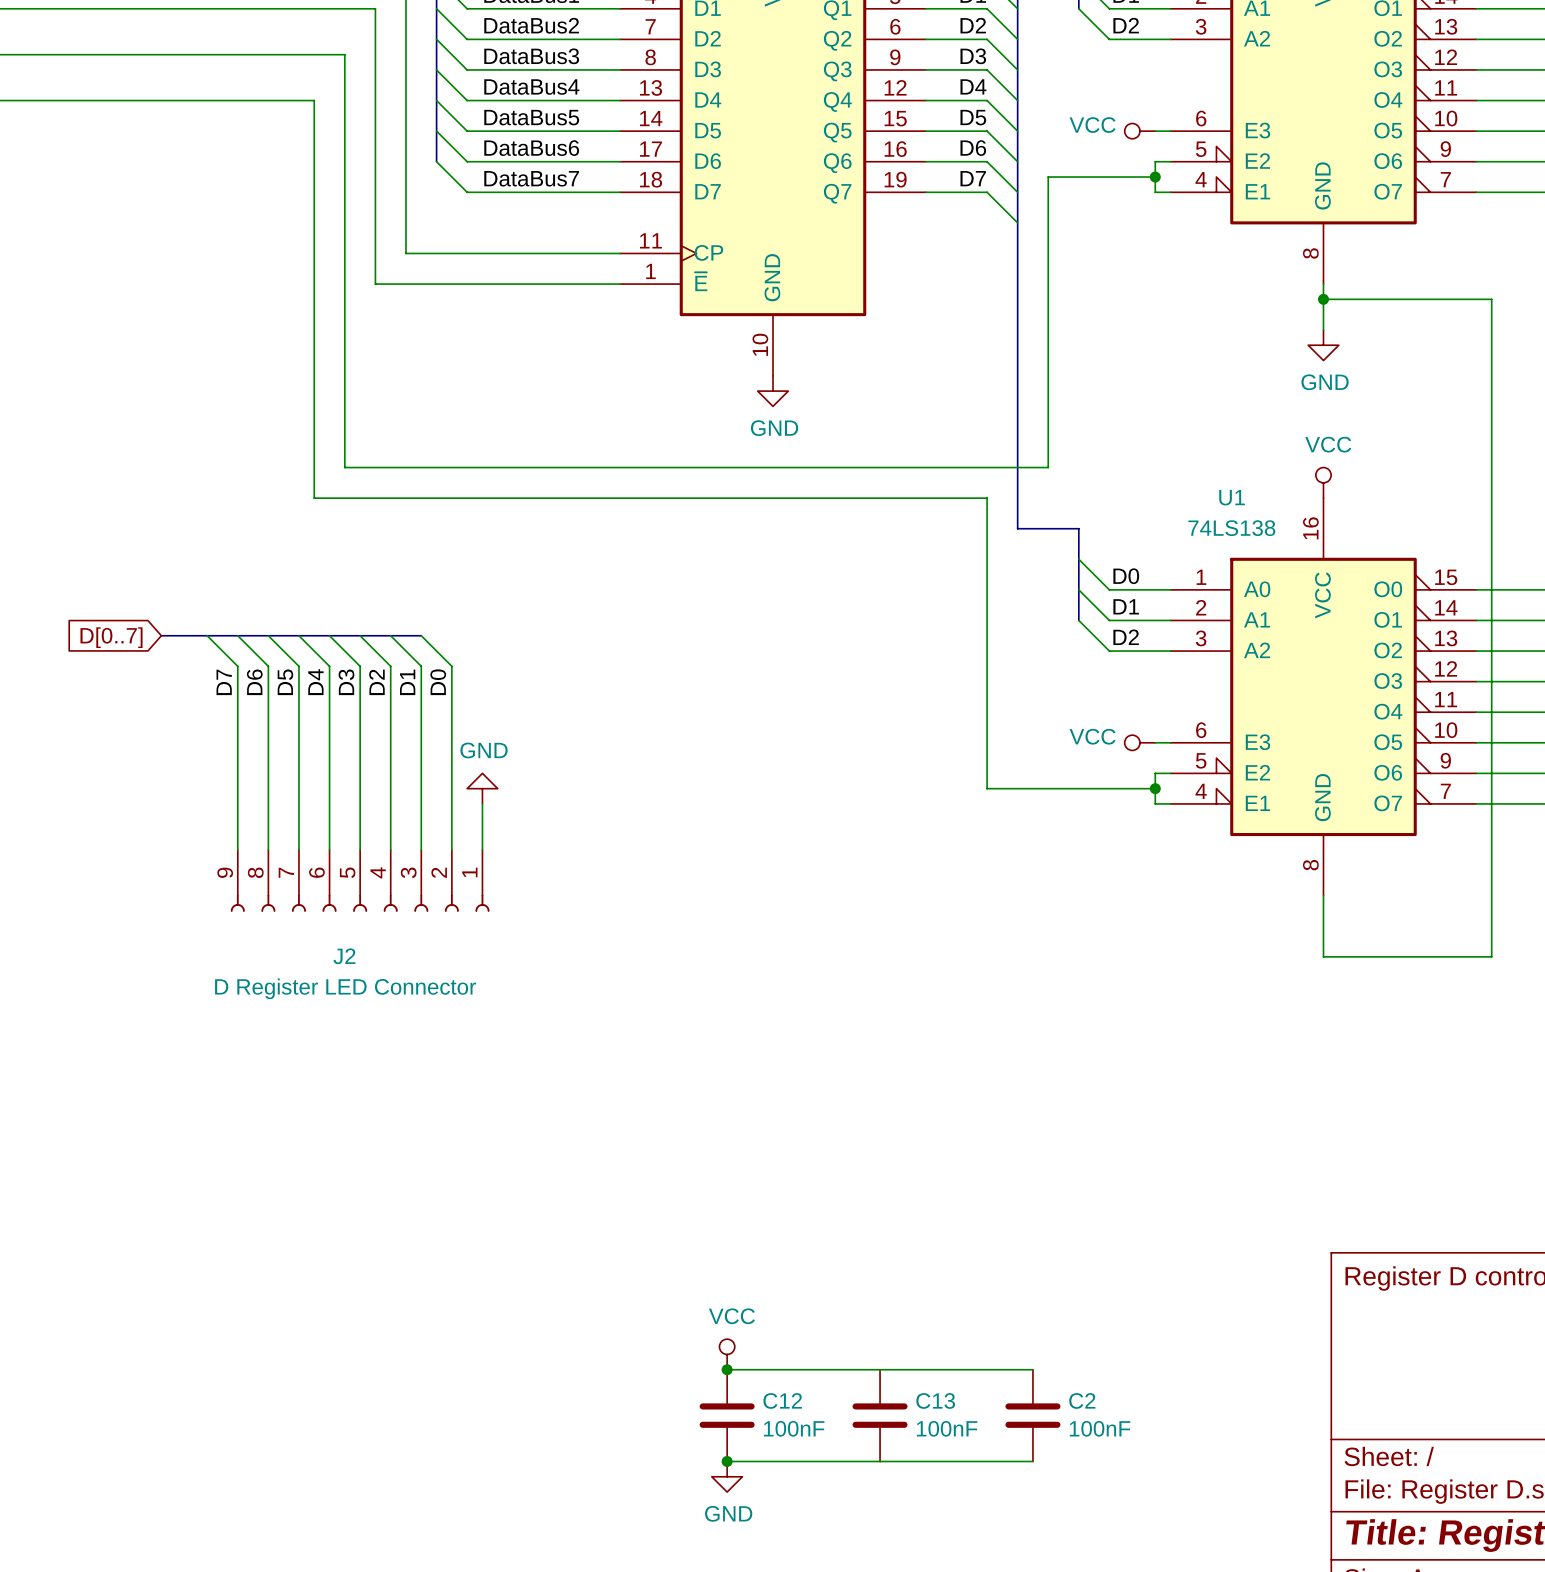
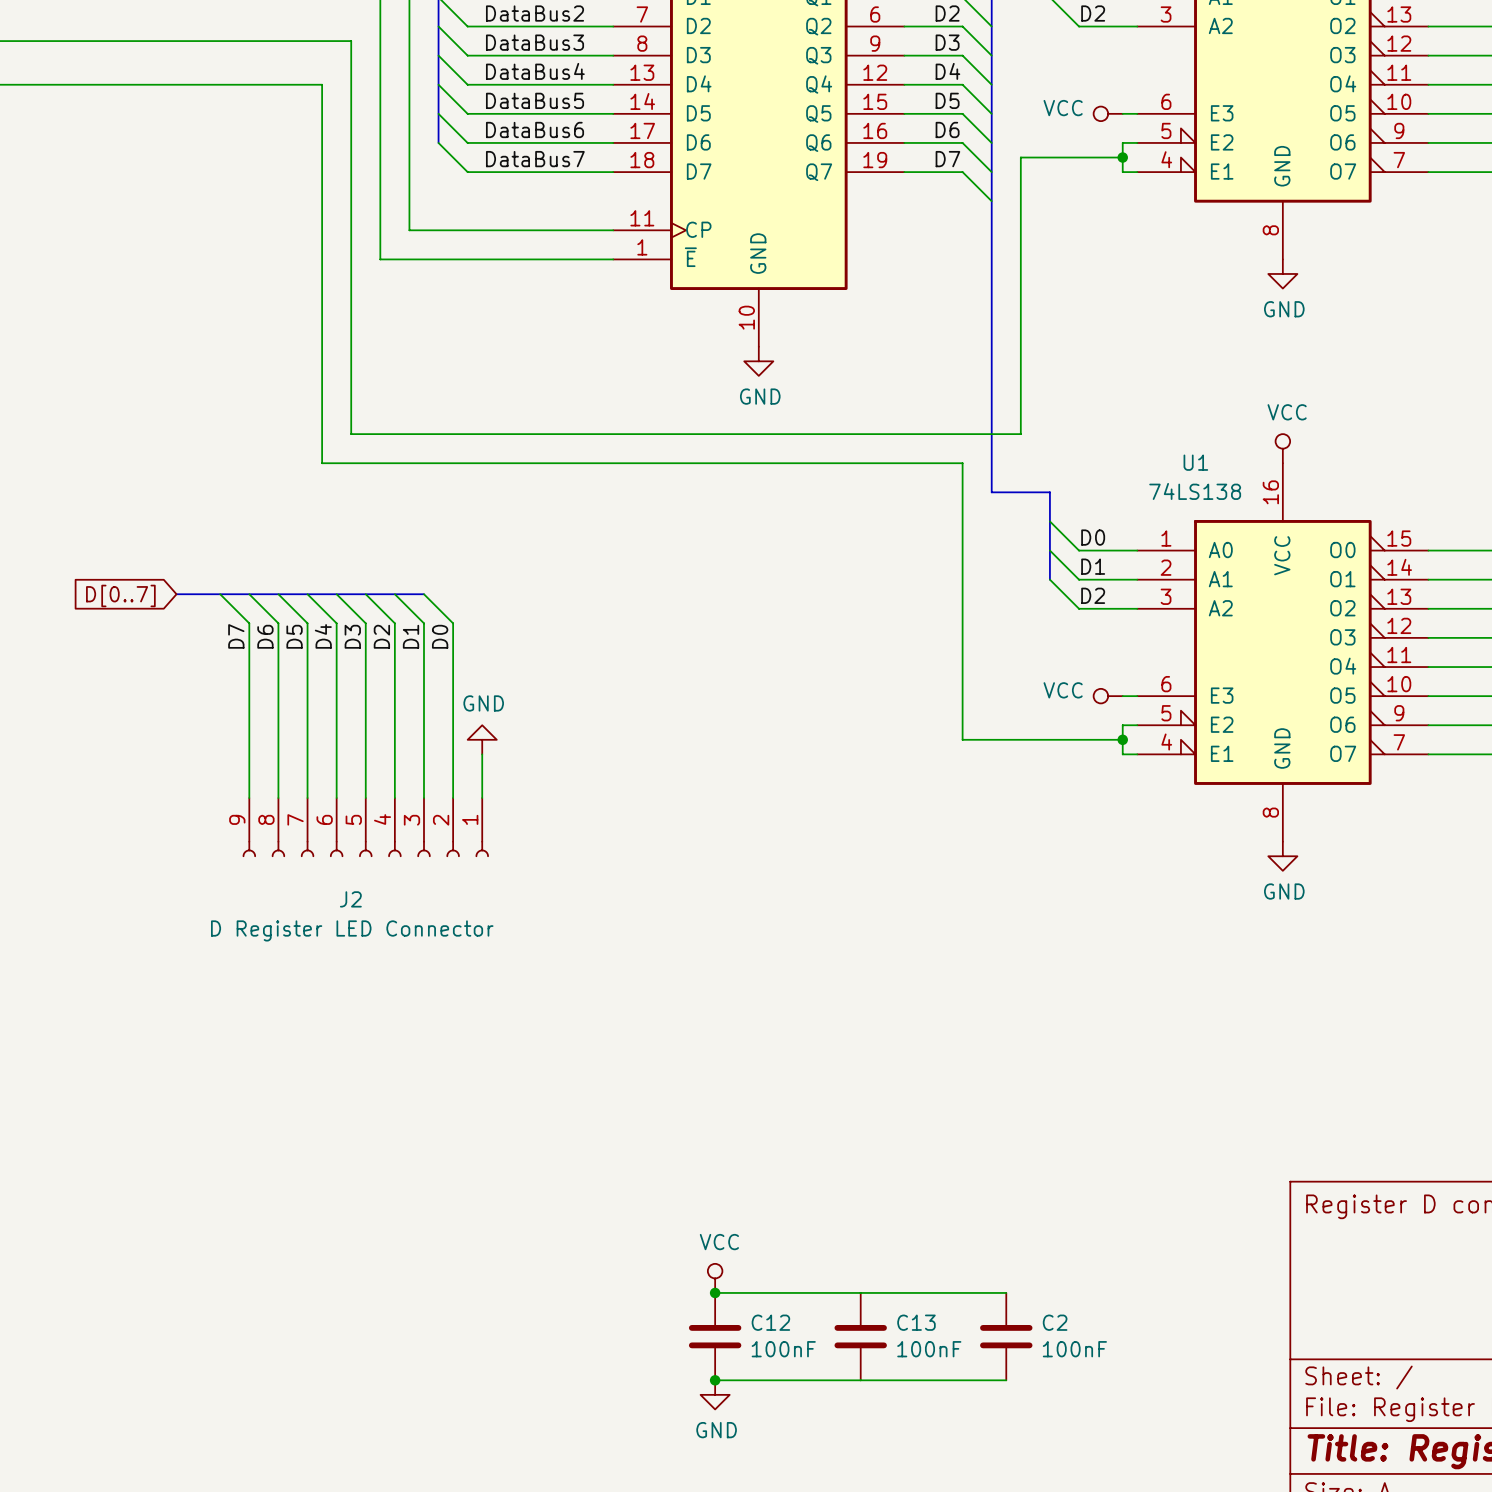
wire: (1323, 284) (1323, 329) -> none
wire: (1323, 299) (1491, 299) (1491, 956) (1323, 956) (1323, 895) -> none
junction: (1323, 299) -> none
power symbol position: GND (1323, 345) -> GND (1282, 273)
power symbol: none -> GND (1282, 856)

